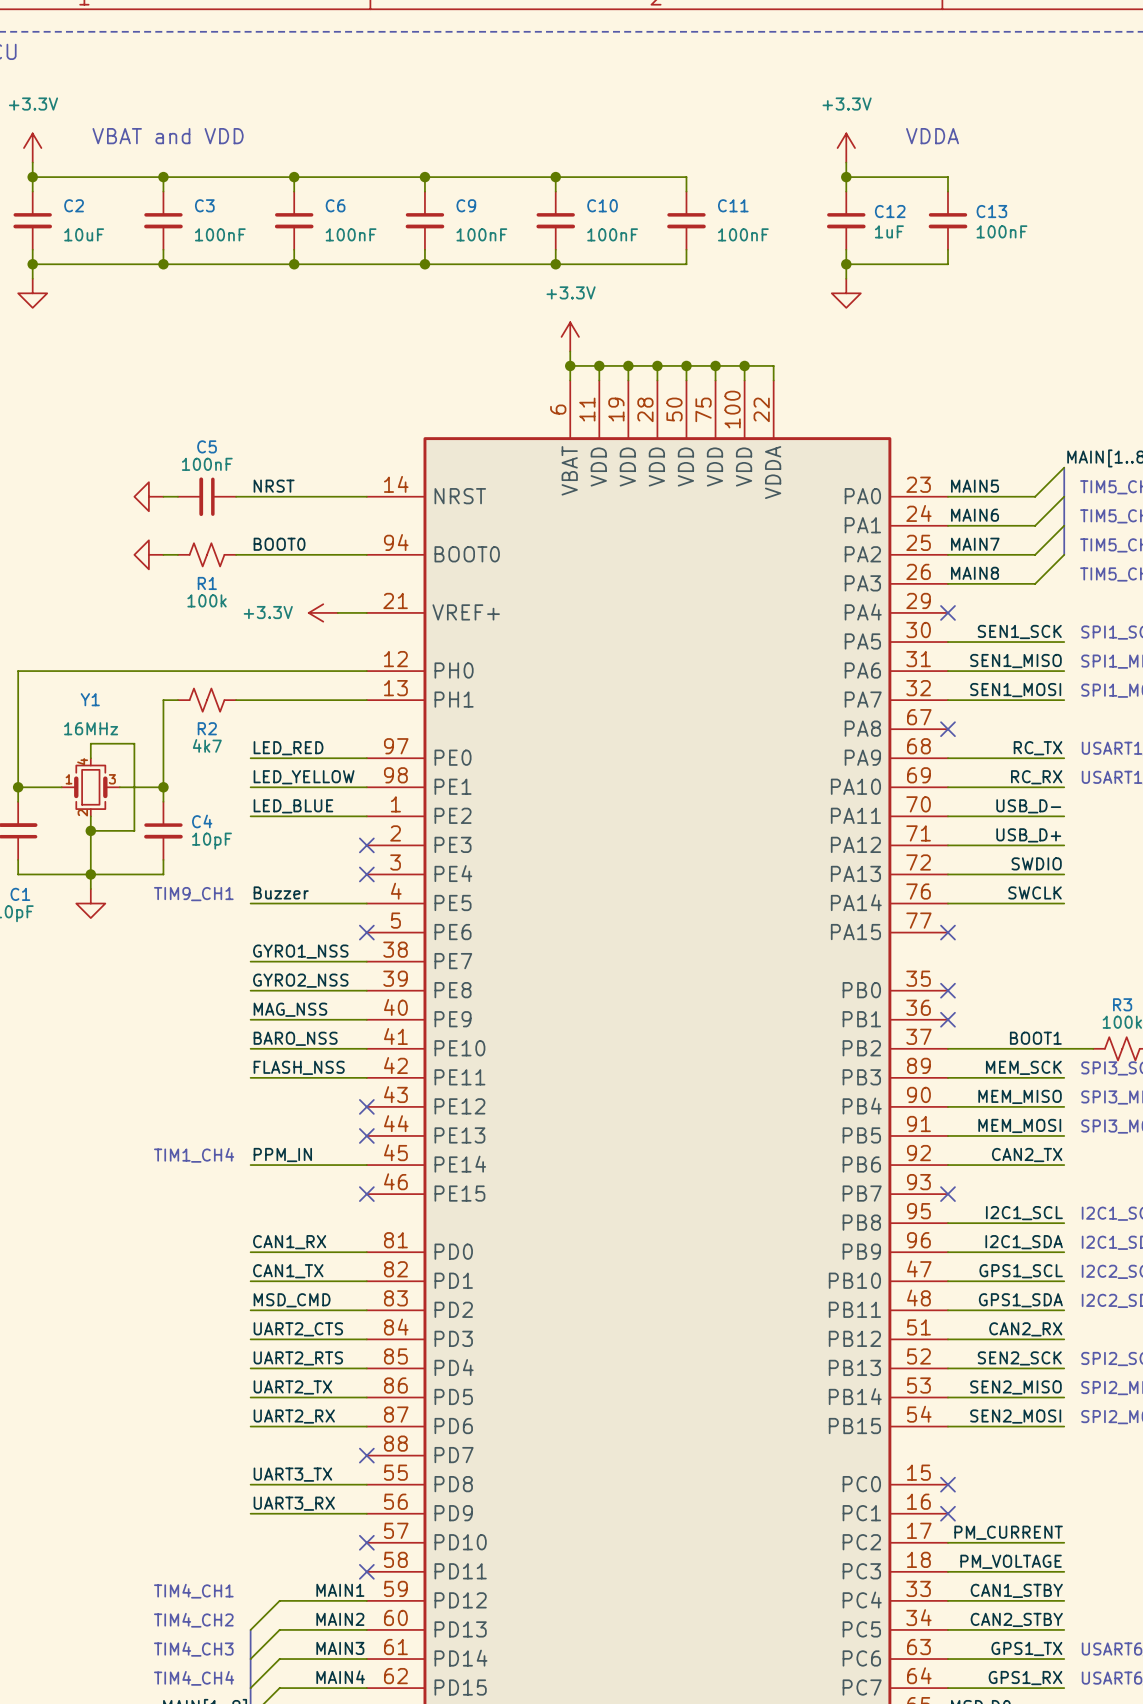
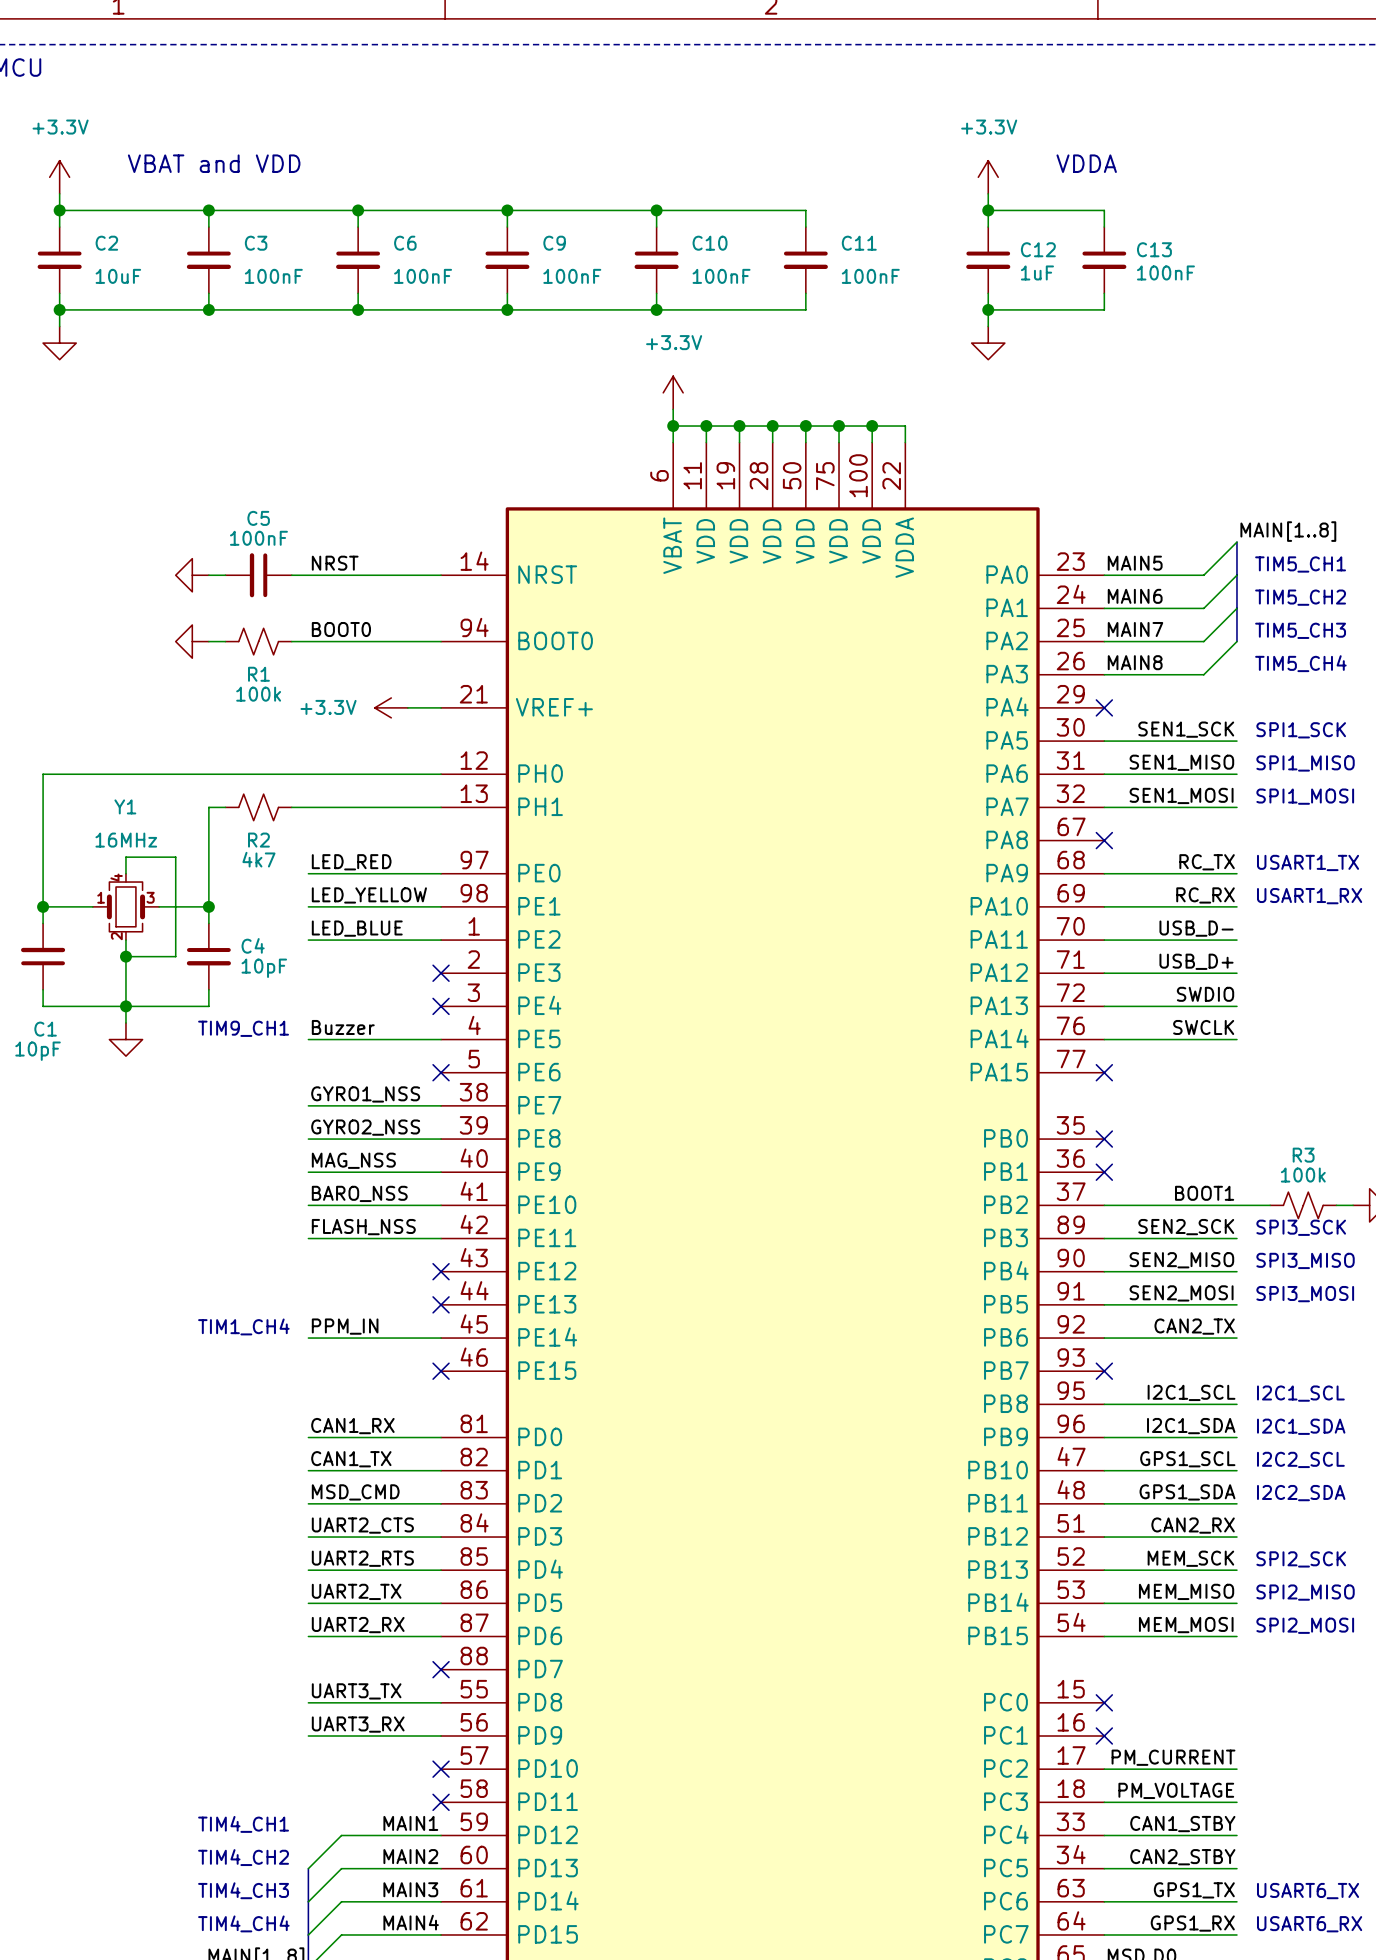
label: MEM_SCK (1023, 1067) -> SEN2_SCK (1186, 1227)
label: MEM_MISO (1020, 1096) -> SEN2_MISO (1181, 1260)
label: MEM_MOSI (1019, 1125) -> SEN2_MOSI (1181, 1293)
label: SEN2_SCK (1019, 1358) -> MEM_SCK (1190, 1558)
label: SEN2_MISO (1015, 1387) -> MEM_MISO (1186, 1591)
label: SEN2_MOSI (1015, 1416) -> MEM_MOSI (1186, 1625)

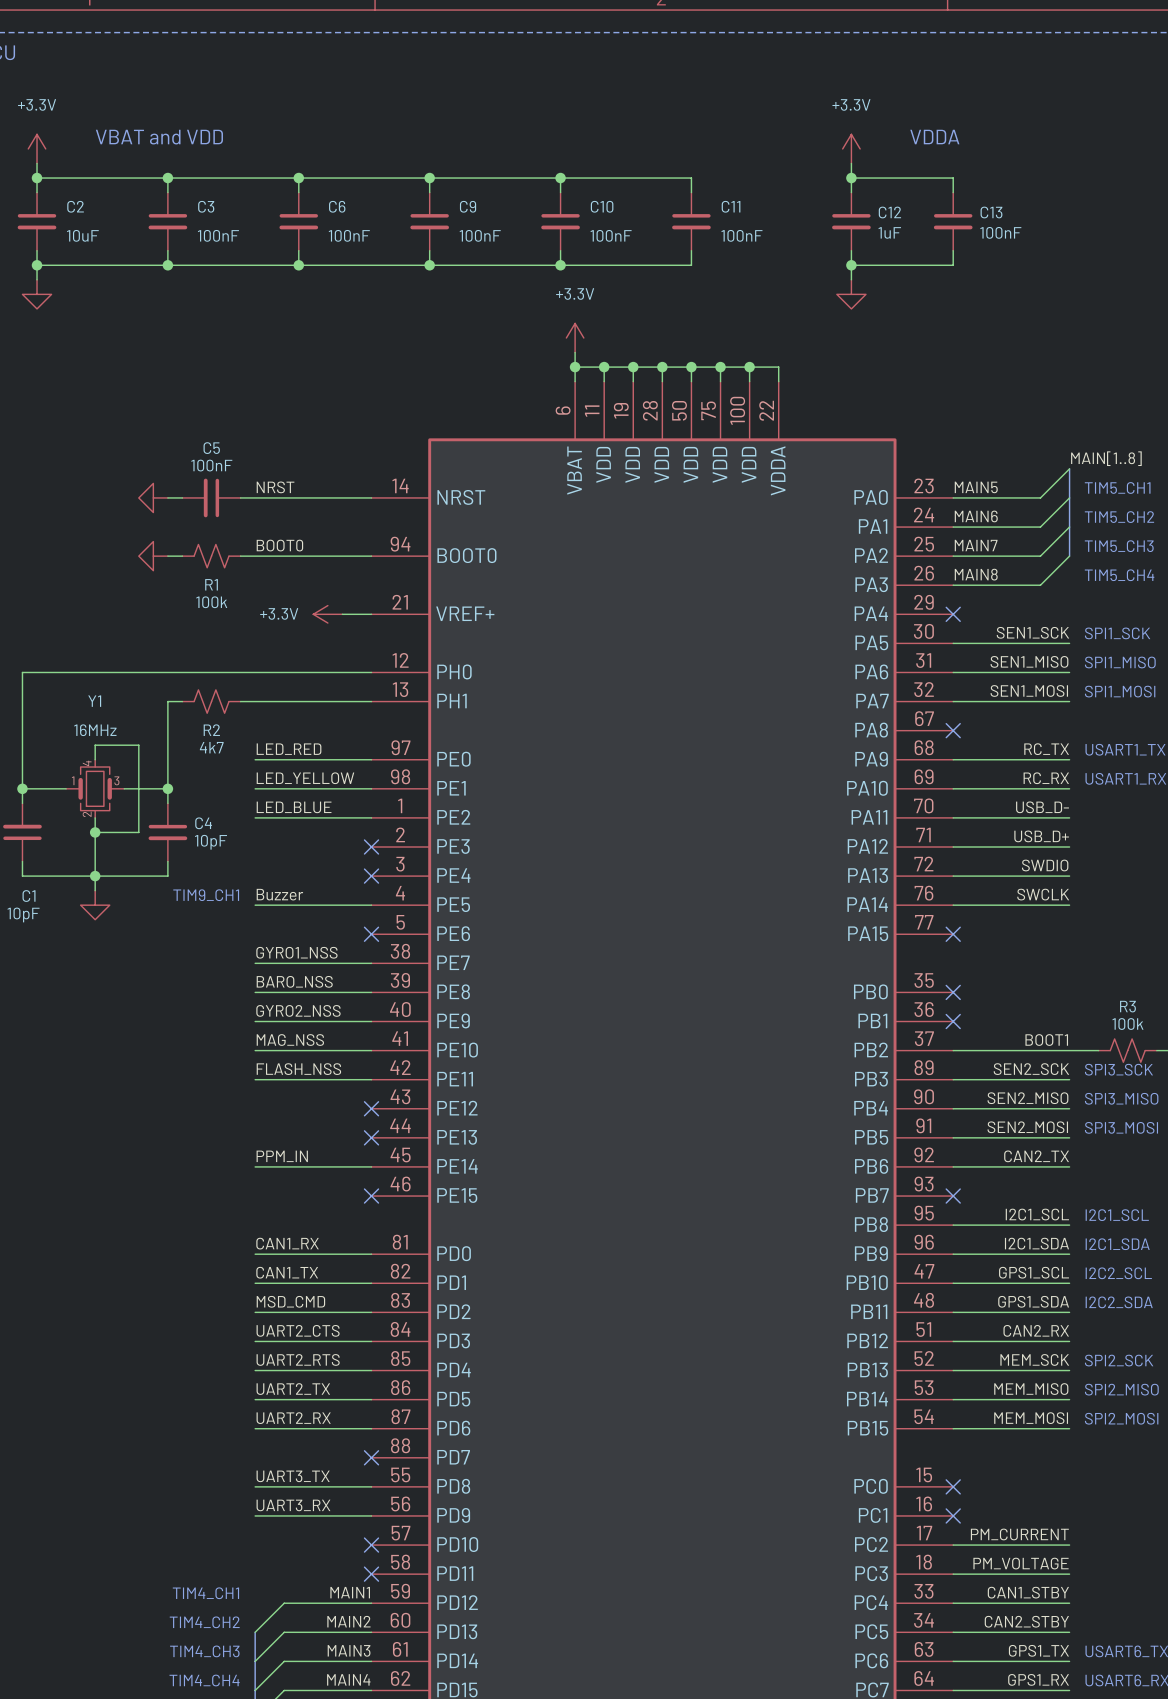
label: GYRO2_NSS (365, 1127) -> BARO_NSS (294, 981)
label: MAG_NSS (353, 1160) -> GYRO2_NSS (298, 1010)
label: BARO_NSS (359, 1193) -> MAG_NSS (290, 1040)
text: TIM1_CH4 (243, 1326) -> none

